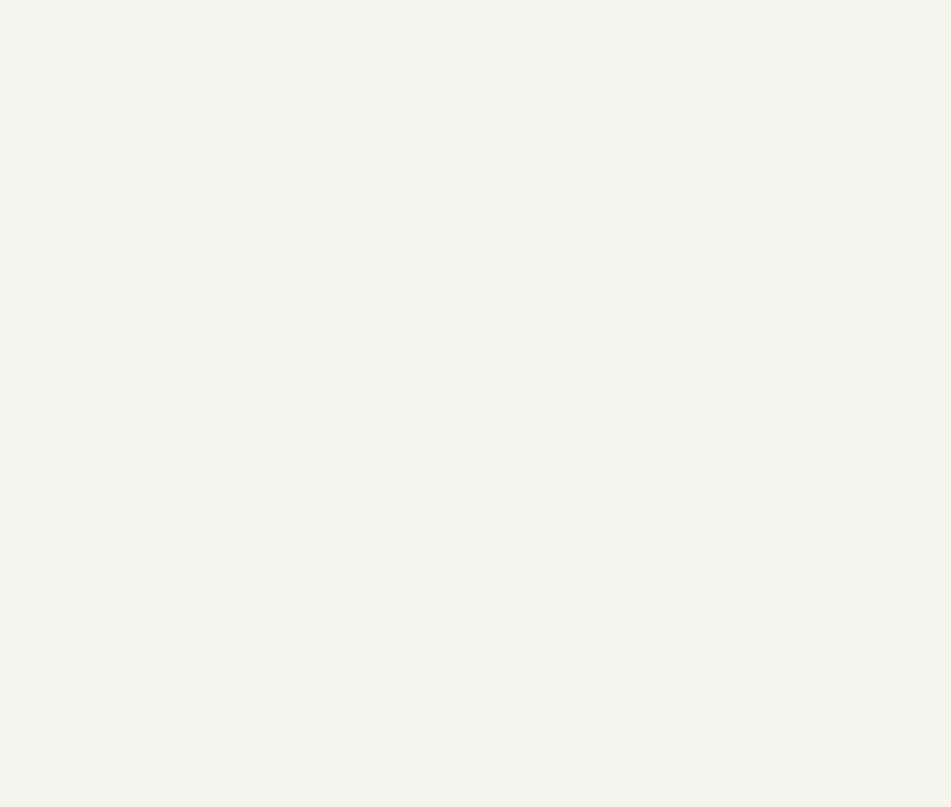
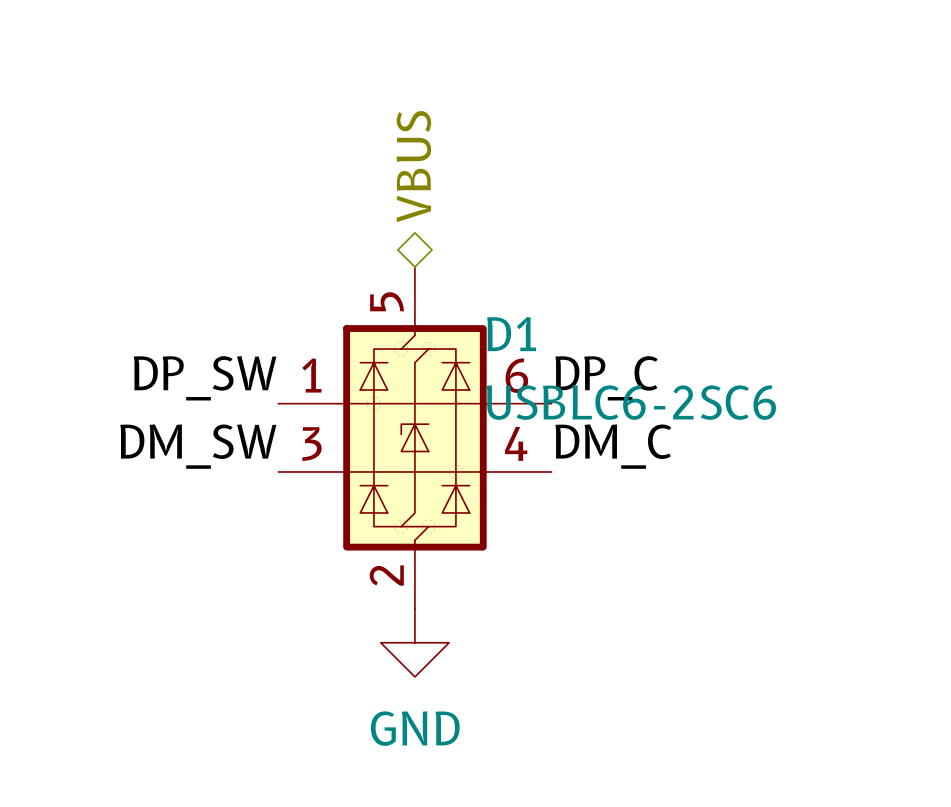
hierarchical label: none -> VBUS (413, 166)
label: none -> DP_SW (205, 378)
label: none -> DP_C (606, 378)
D1: none -> USBLC6-2SC6 (414, 437)
label: none -> DM_SW (198, 446)
label: none -> DM_C (613, 446)
power symbol: none -> GND (414, 642)

